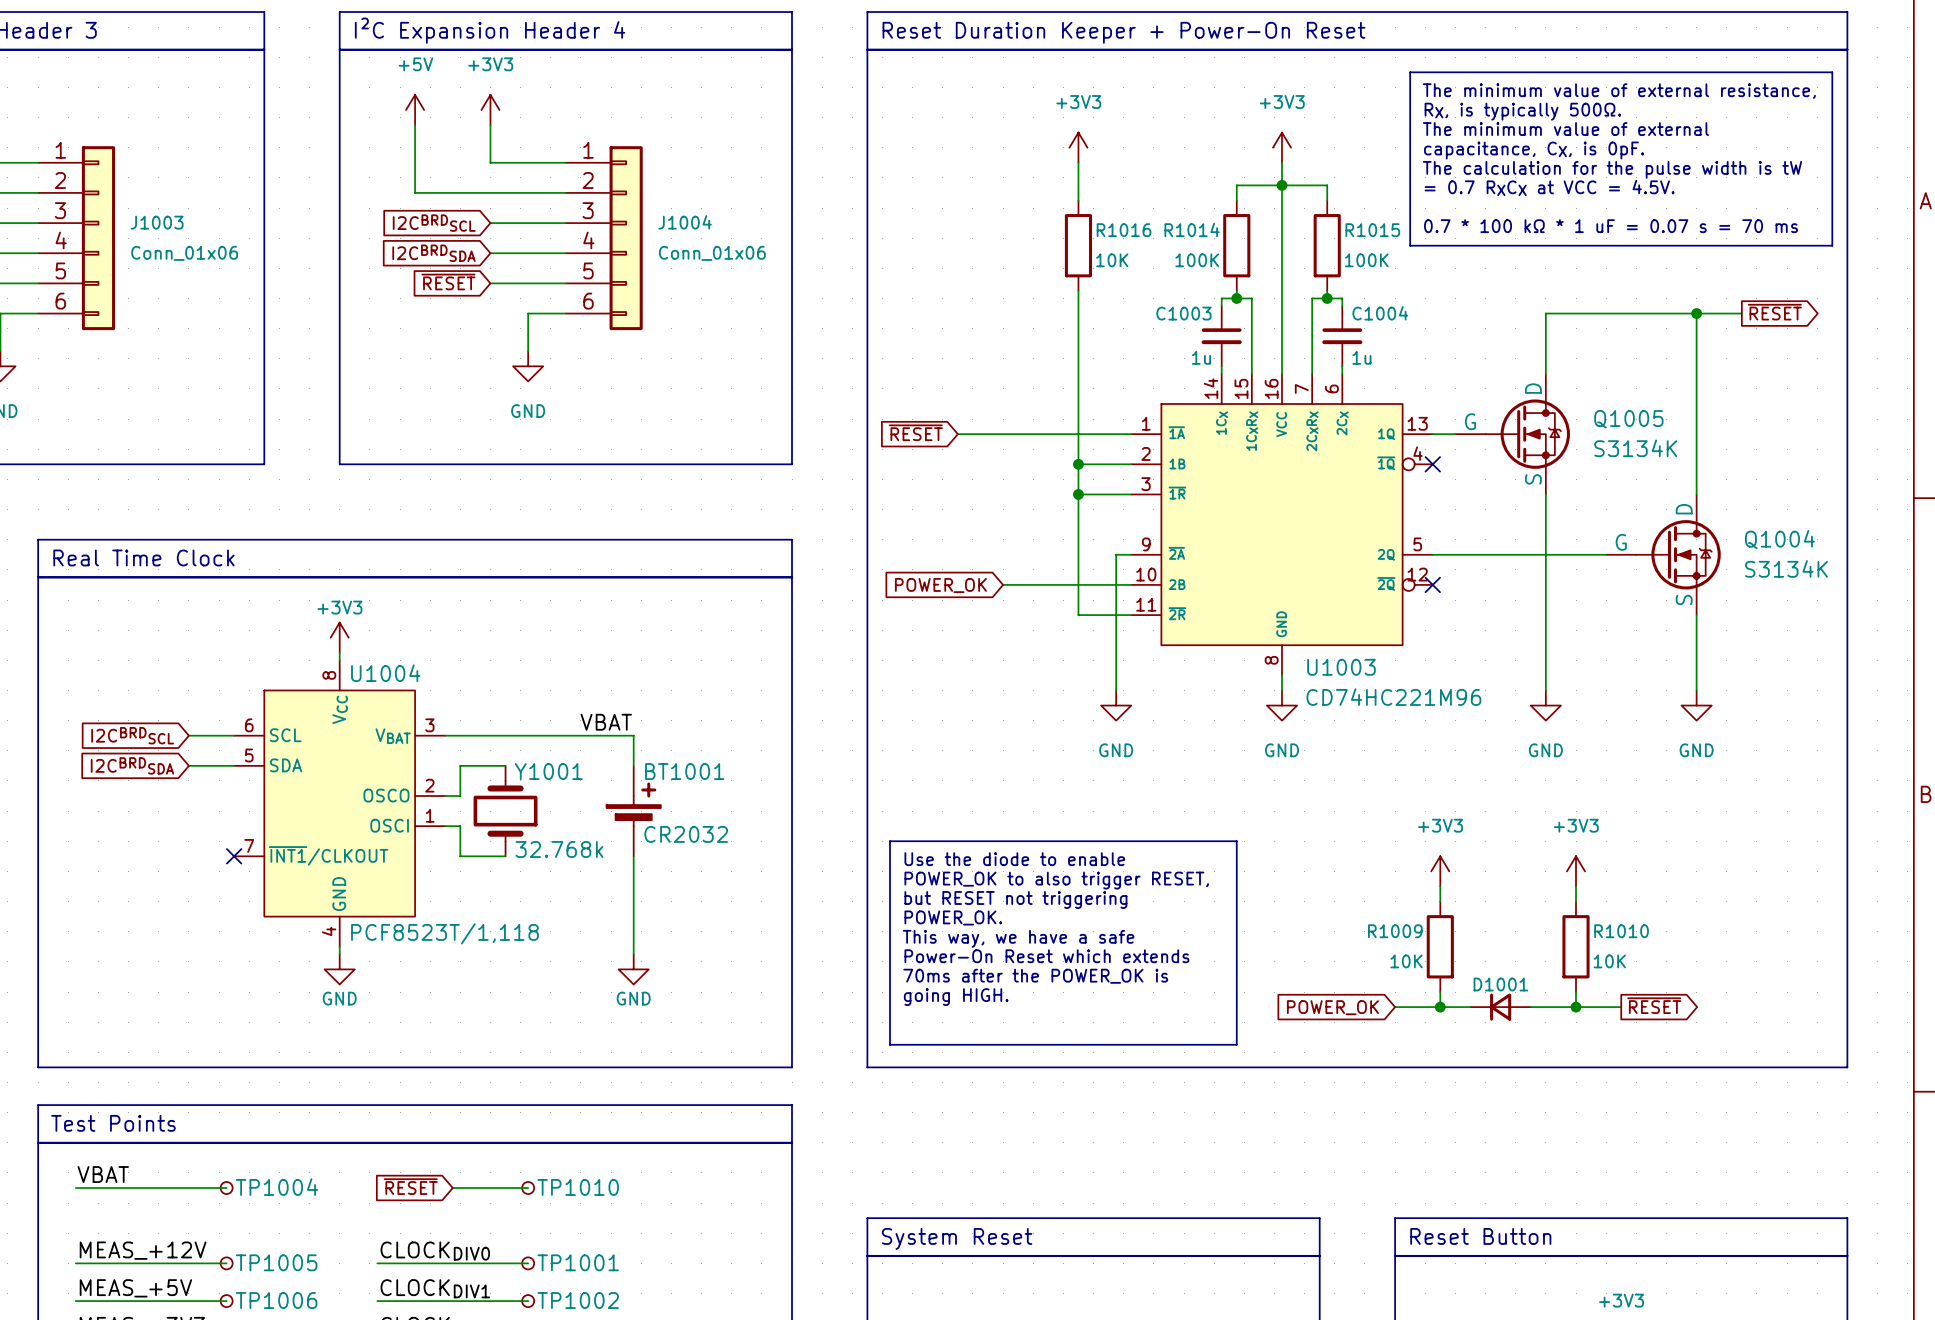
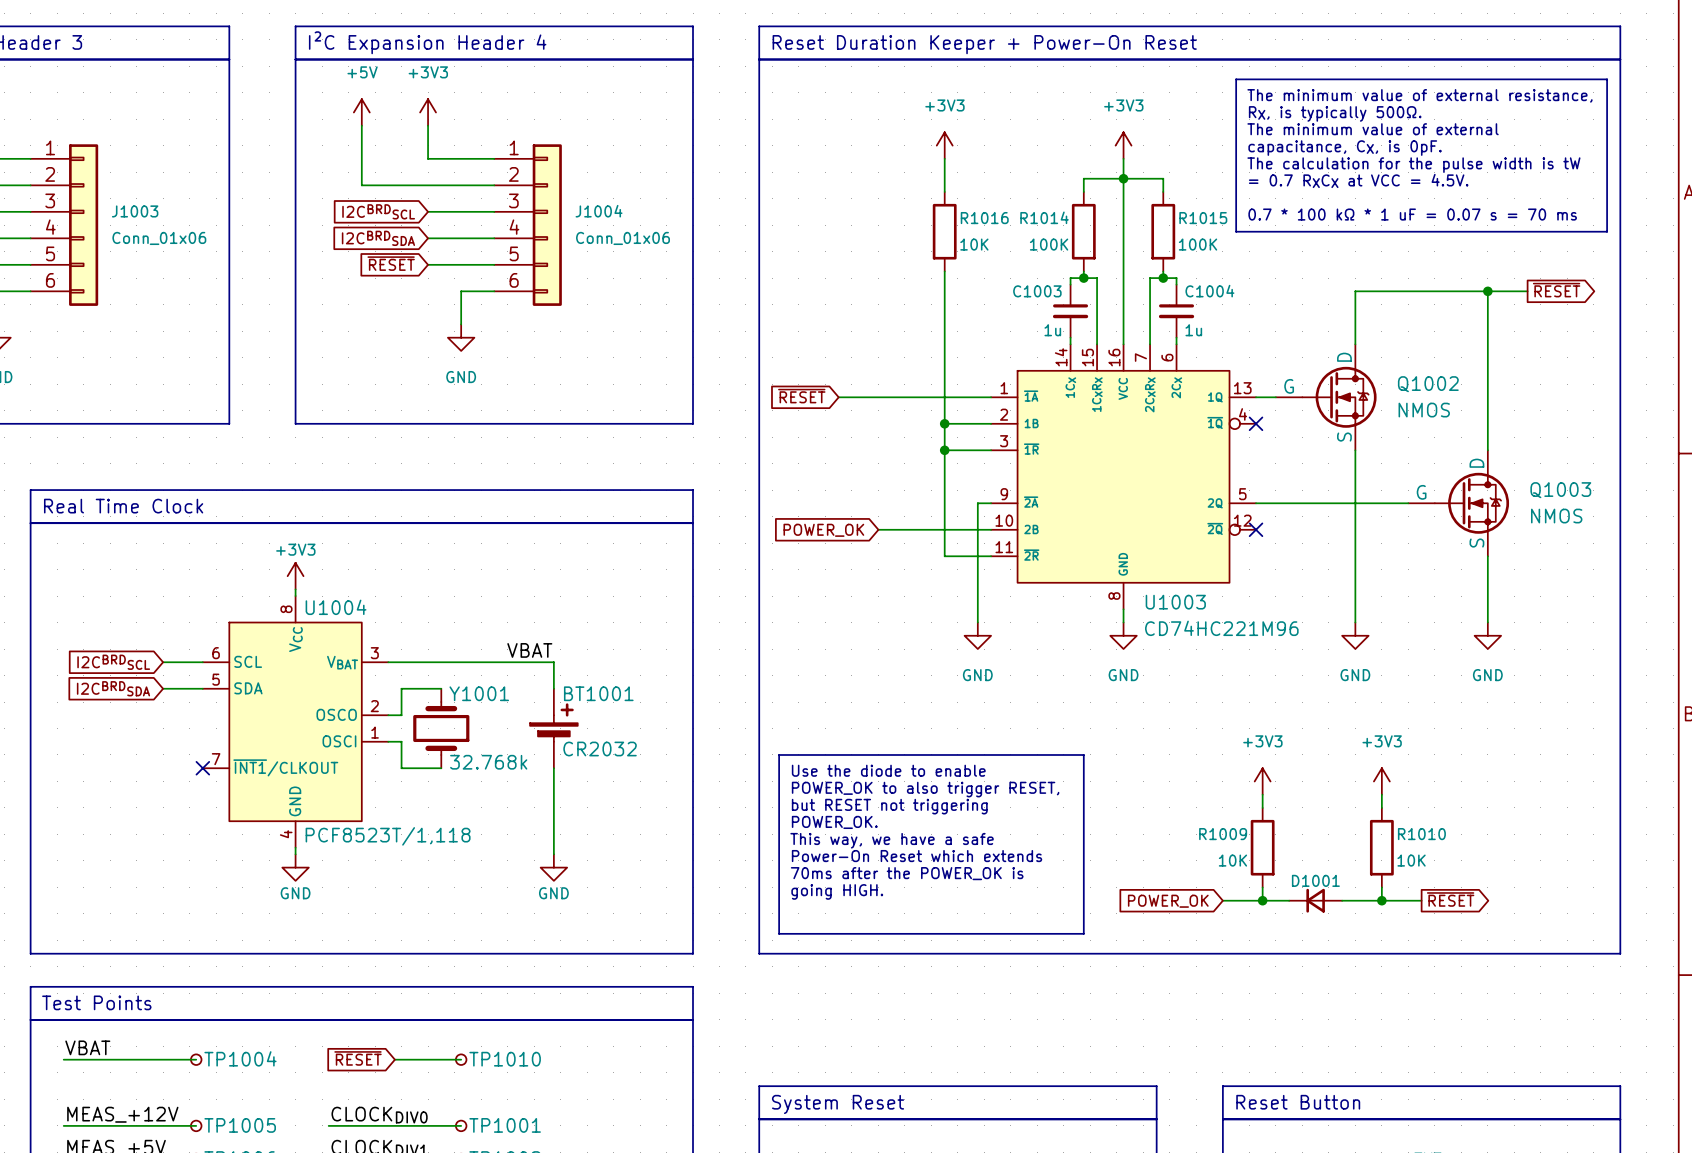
Q1005 name: Q1005 (1628, 419) -> Q1002 (1428, 384)
Q1005 value: S3134K (1635, 448) -> NMOS (1424, 410)
Q1004 name: Q1004 (1780, 539) -> Q1003 (1560, 490)
Q1004 value: S3134K (1786, 568) -> NMOS (1556, 516)

